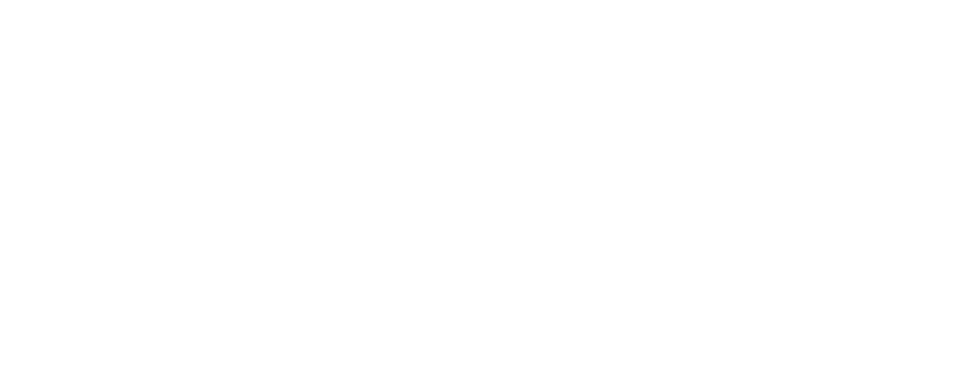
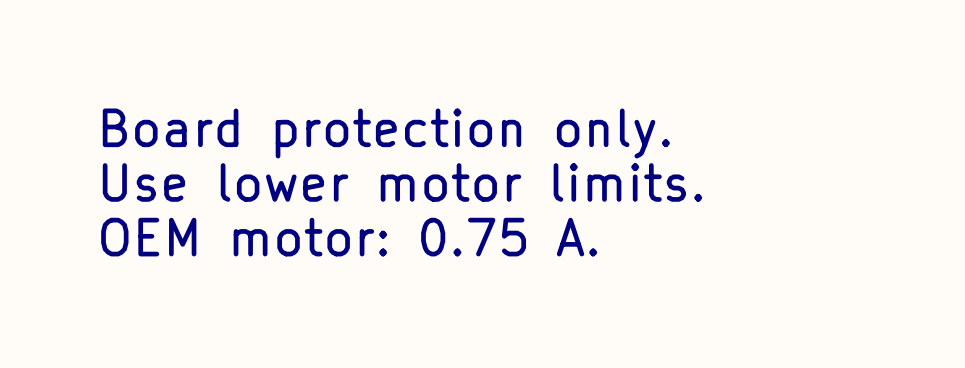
text: none -> Board protection only. (386, 133)
text: none -> Use lower motor limits. (402, 182)
text: none -> OEM motor: 0.75 A. (349, 237)

